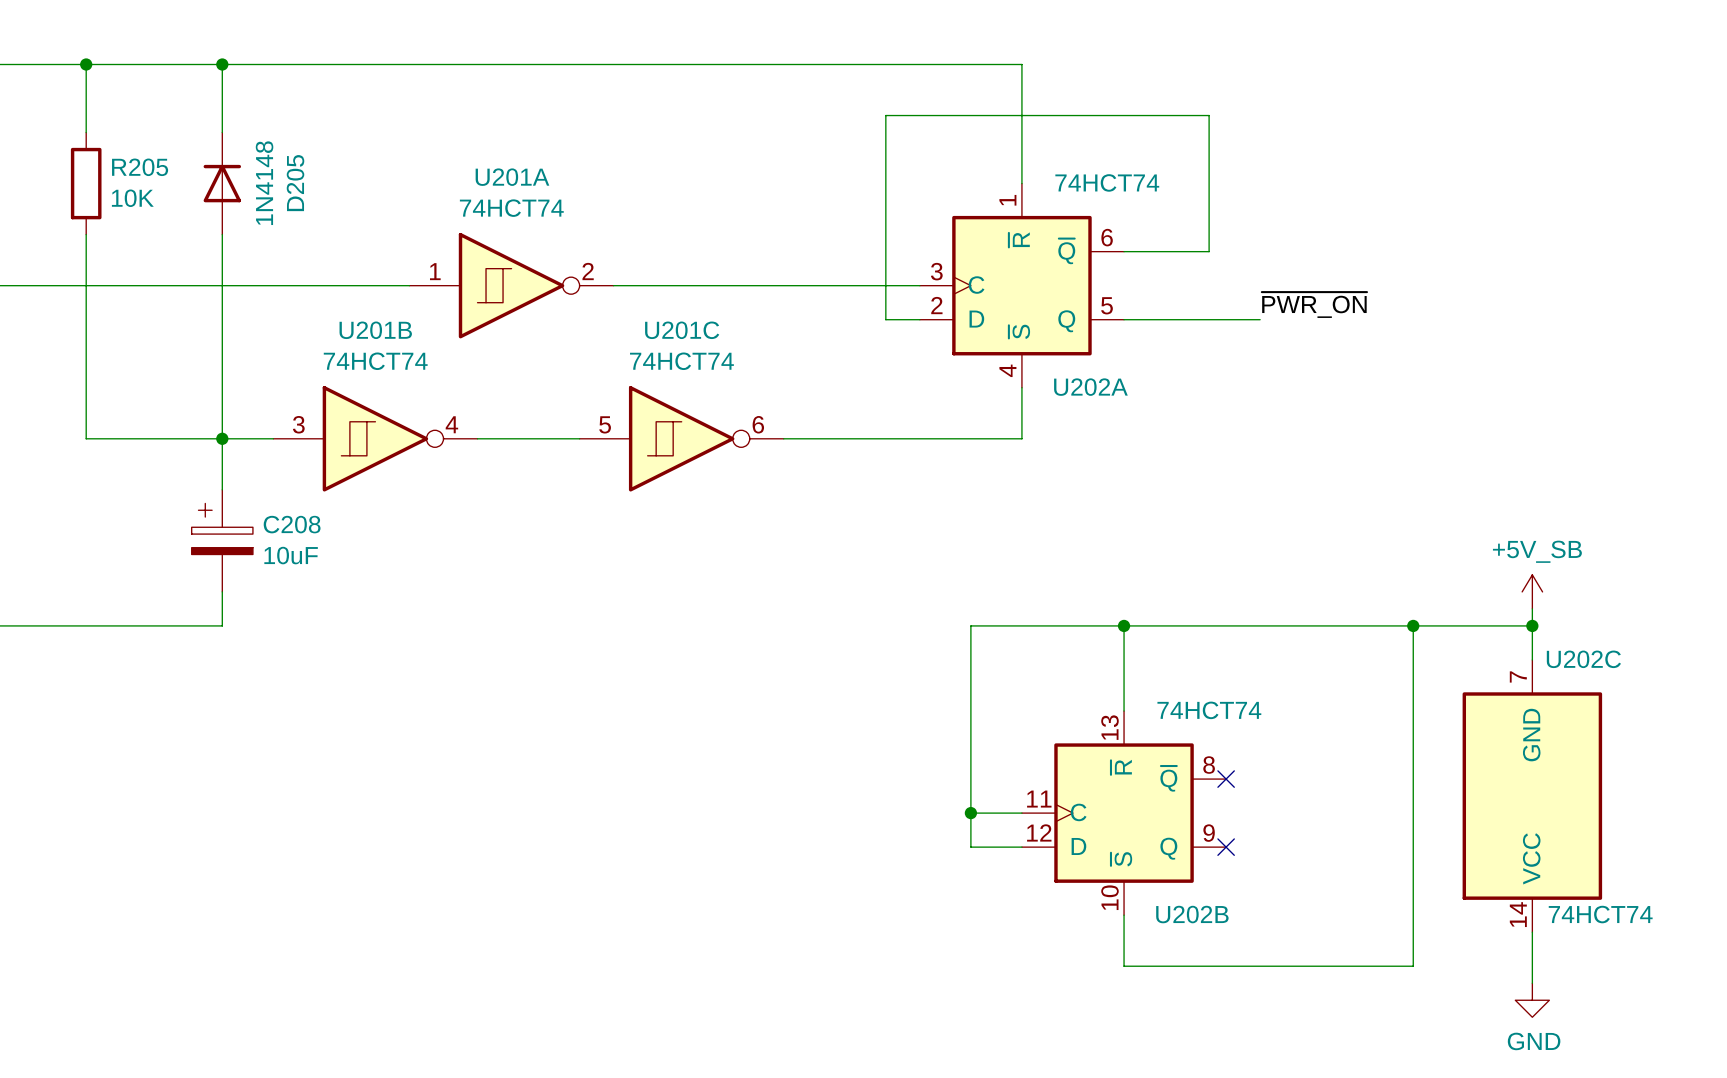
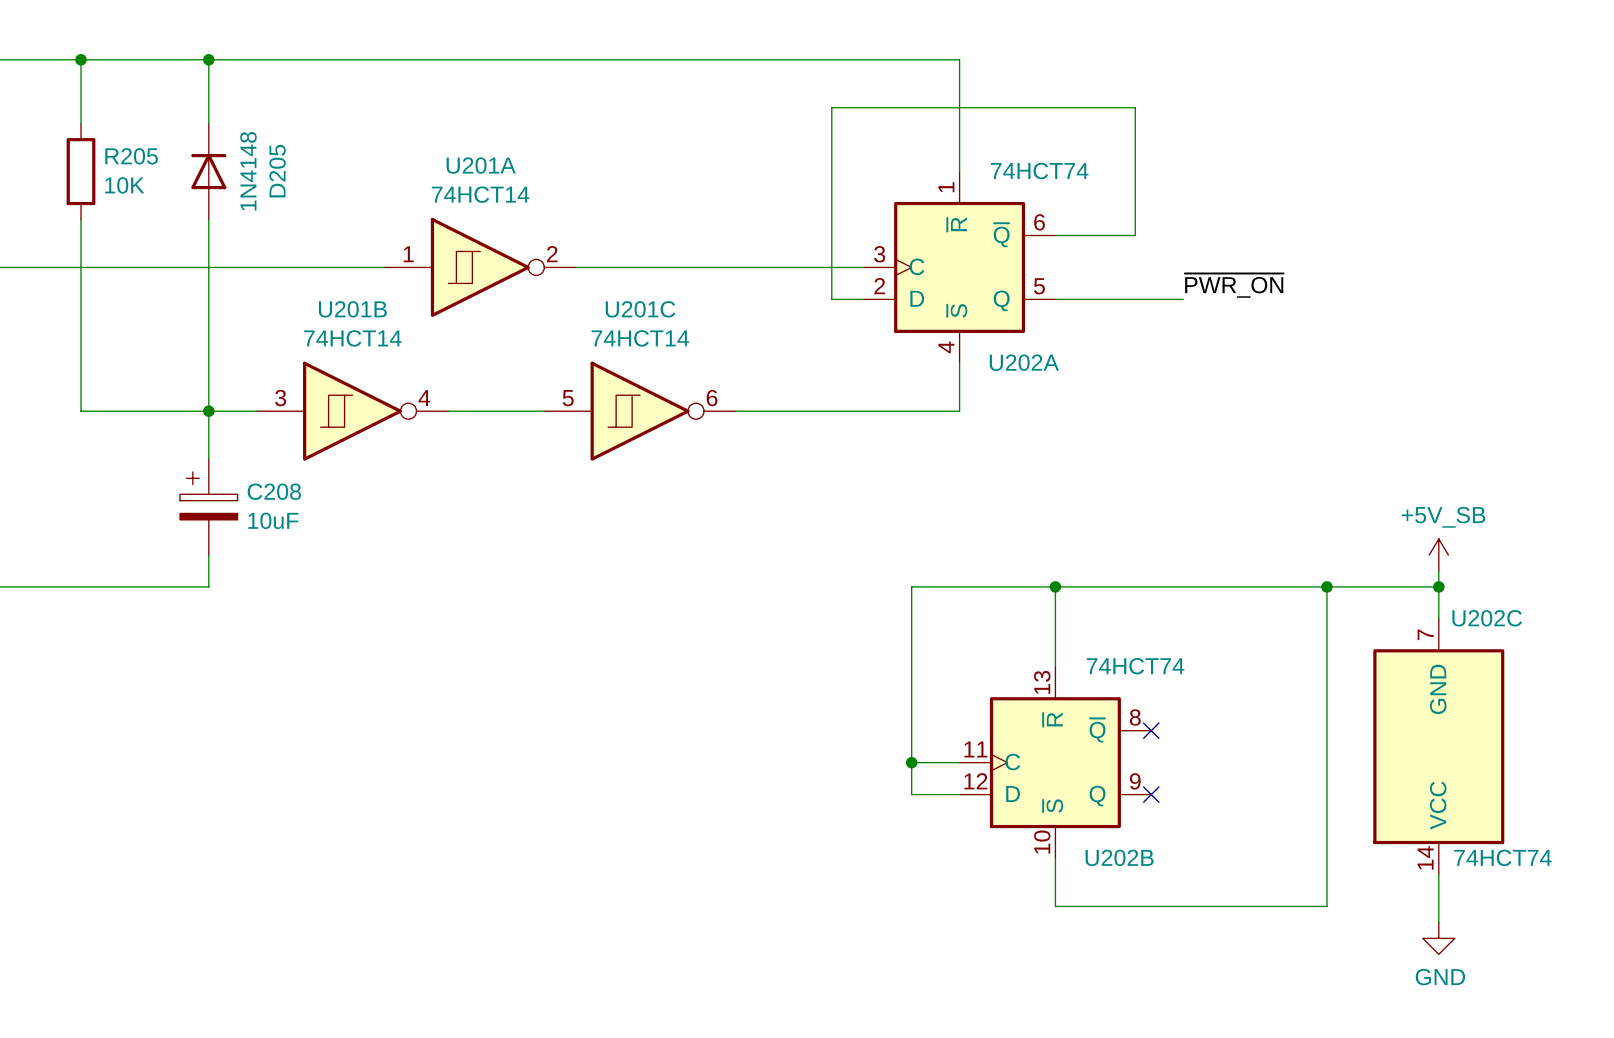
U201A value: 74HCT74 (511, 208) -> 74HCT14 (480, 194)
U201B value: 74HCT74 (375, 361) -> 74HCT14 (352, 338)
U201C value: 74HCT74 (681, 361) -> 74HCT14 (640, 338)

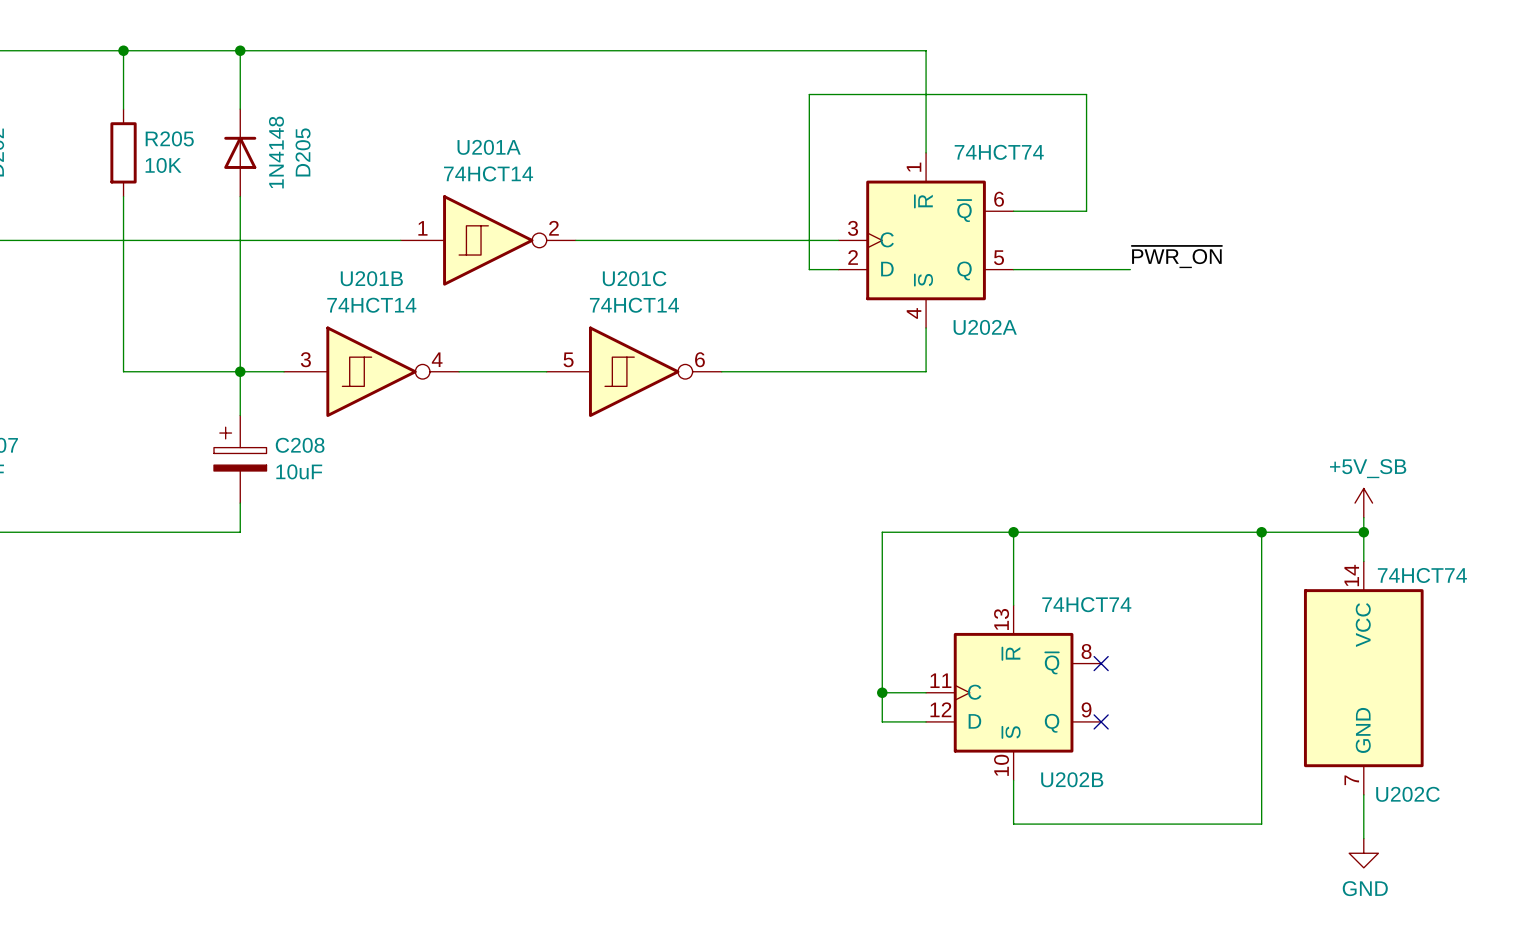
U202C name position: U202C (1487, 618) -> U202C (1407, 794)
U202C rotation: 0° (1438, 746) -> 180° (1363, 678)
U202C value position: 74HCT74 (1502, 857) -> 74HCT74 (1422, 575)

